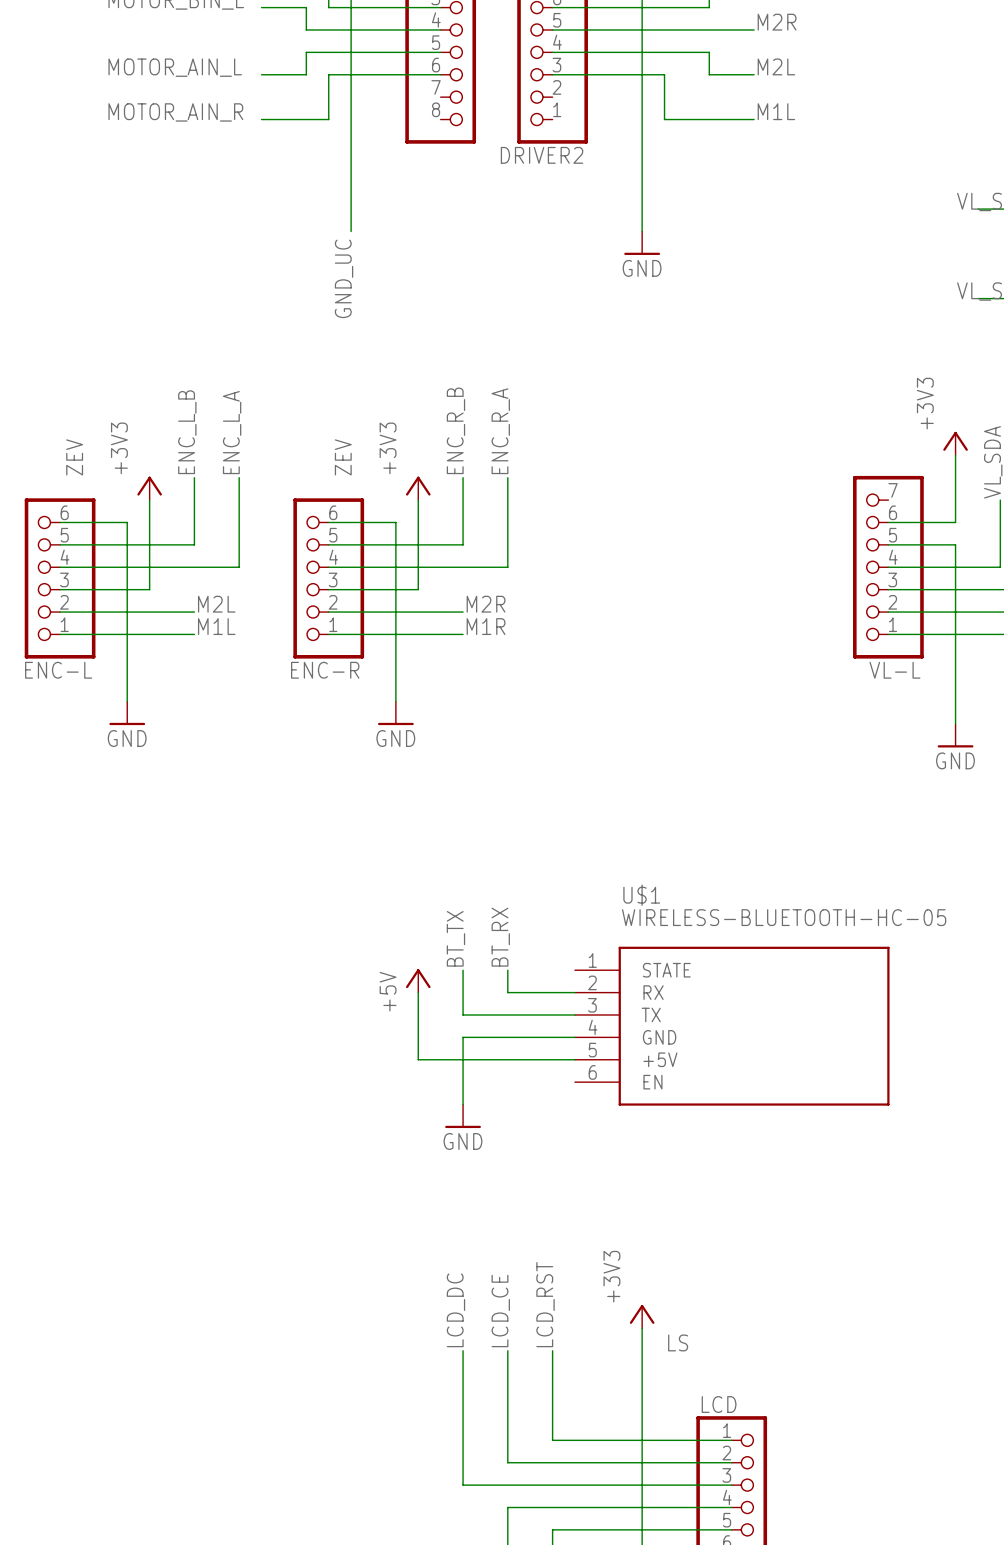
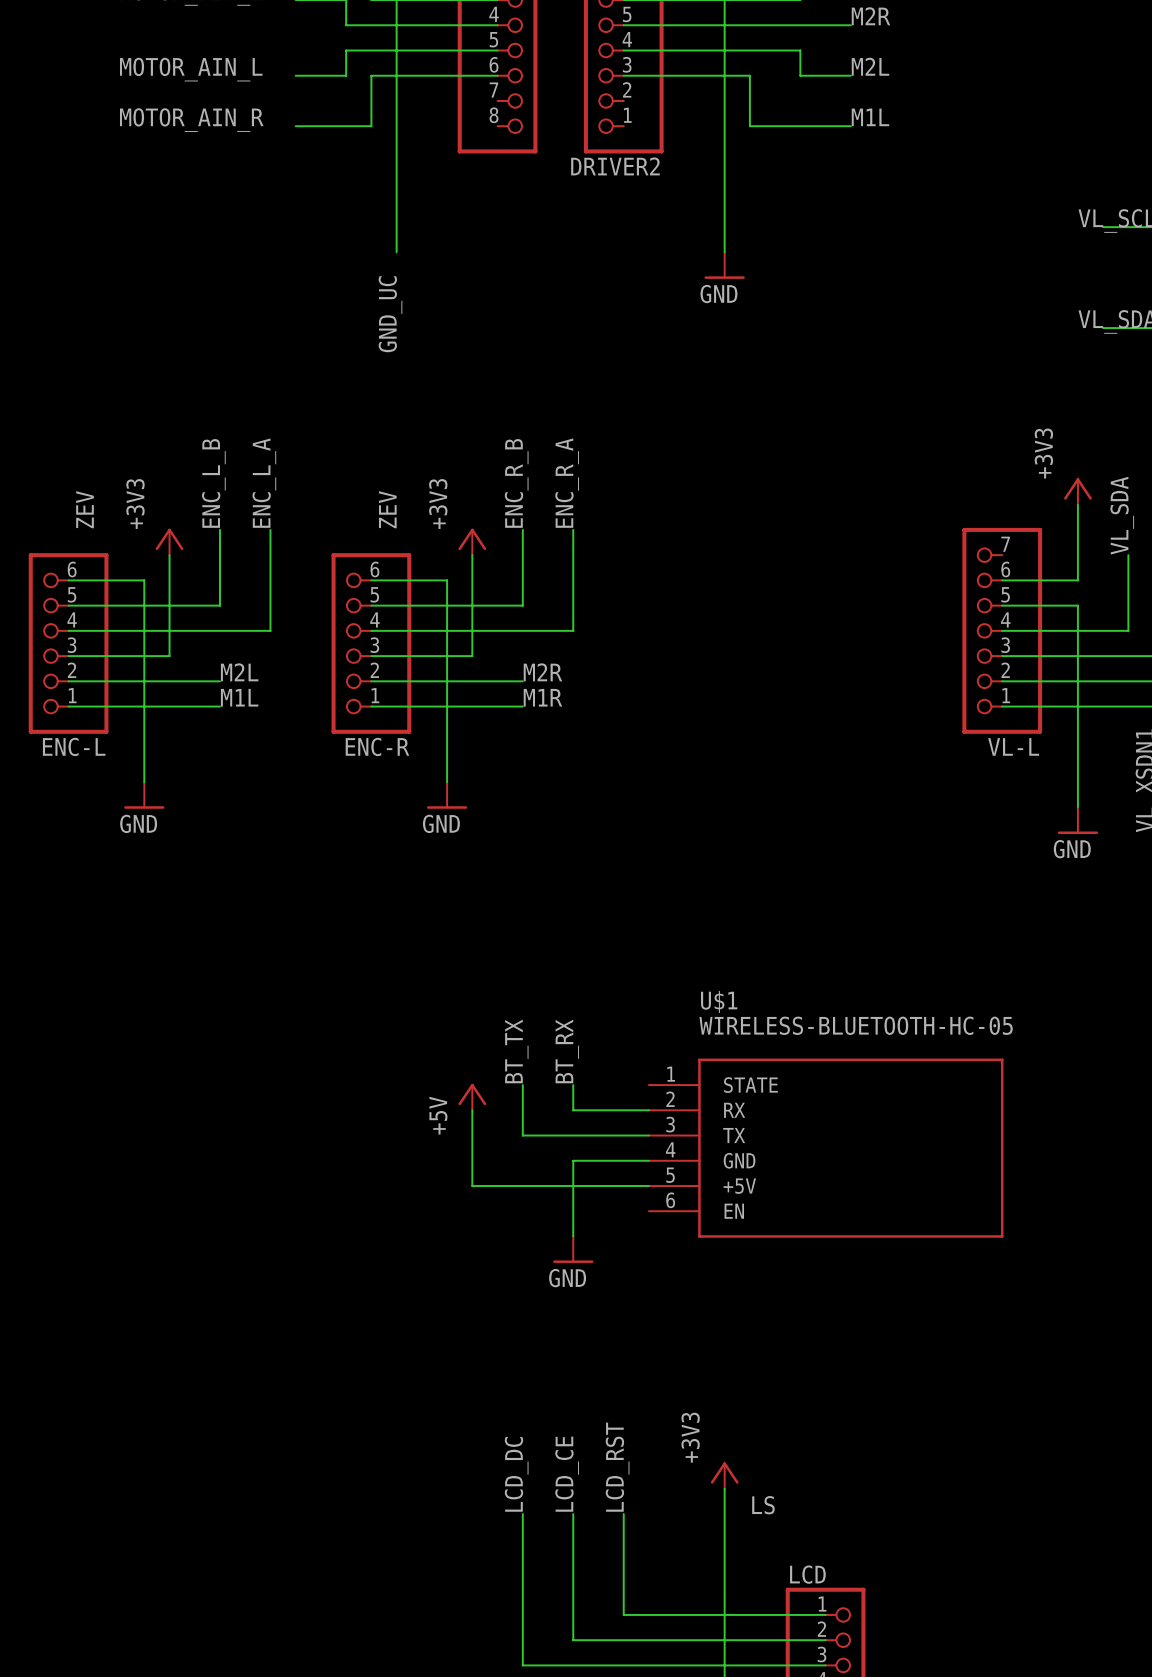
wire: (507, 1037) (463, 1037) (463, 1104) -> (573, 1160) (573, 1236)
power symbol position: GND (463, 1116) -> GND (573, 1249)

